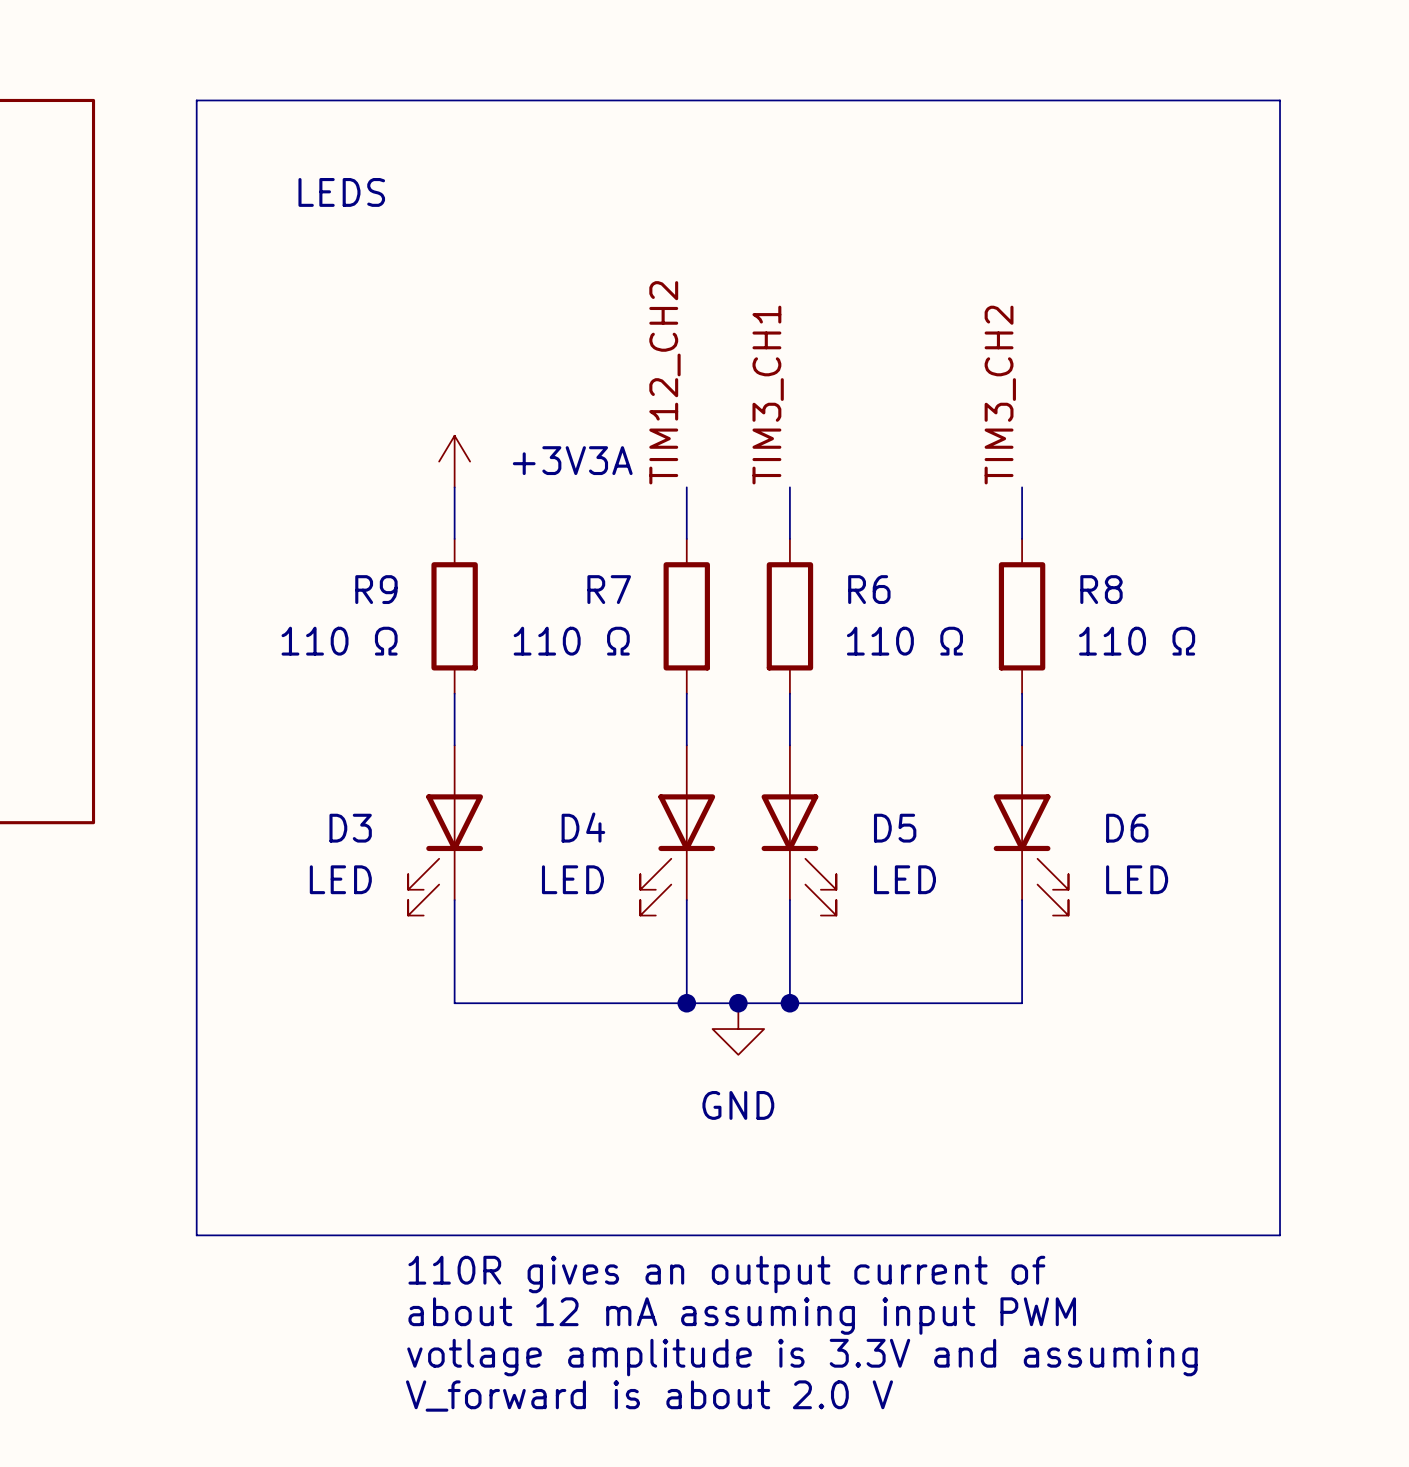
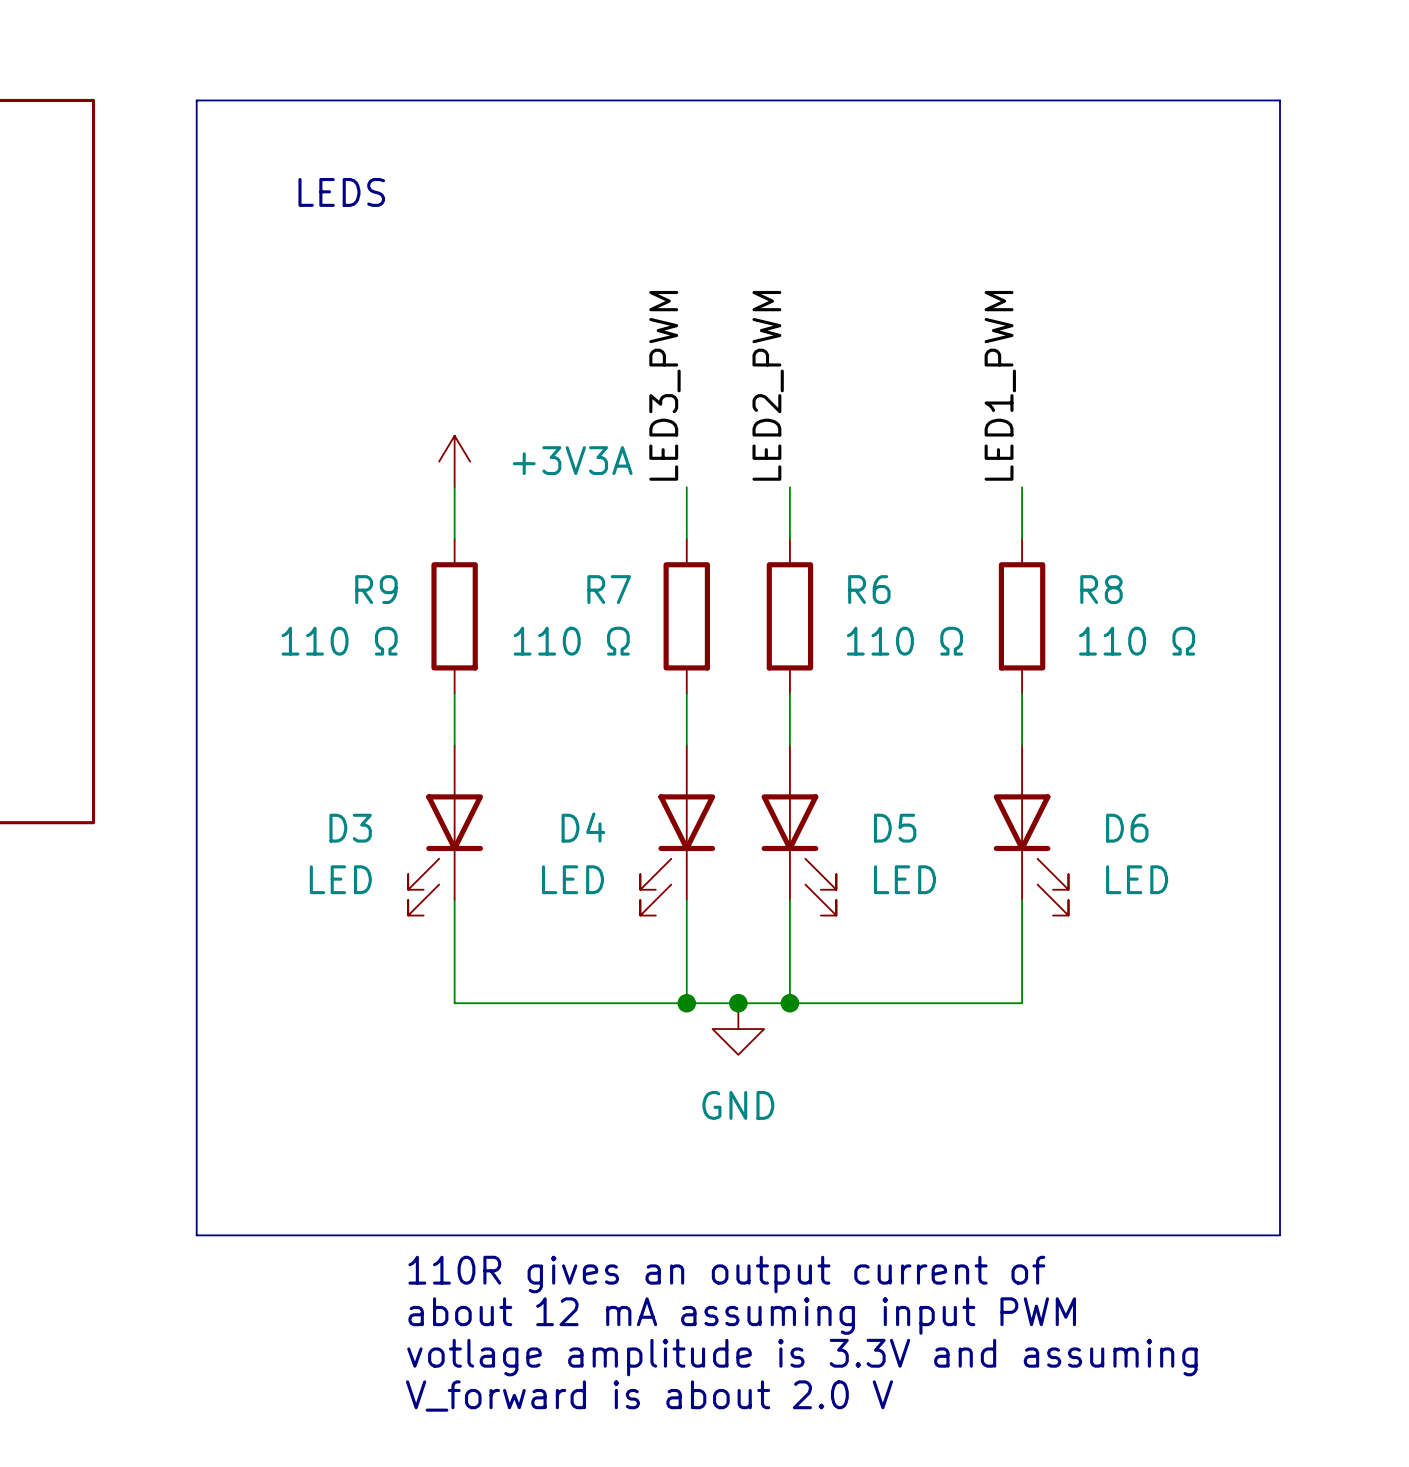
label: TIM12_CH2 (664, 382) -> LED3_PWM (664, 385)
label: TIM3_CH1 (768, 395) -> LED2_PWM (768, 385)
label: TIM3_CH2 (1000, 395) -> LED1_PWM (1000, 385)

